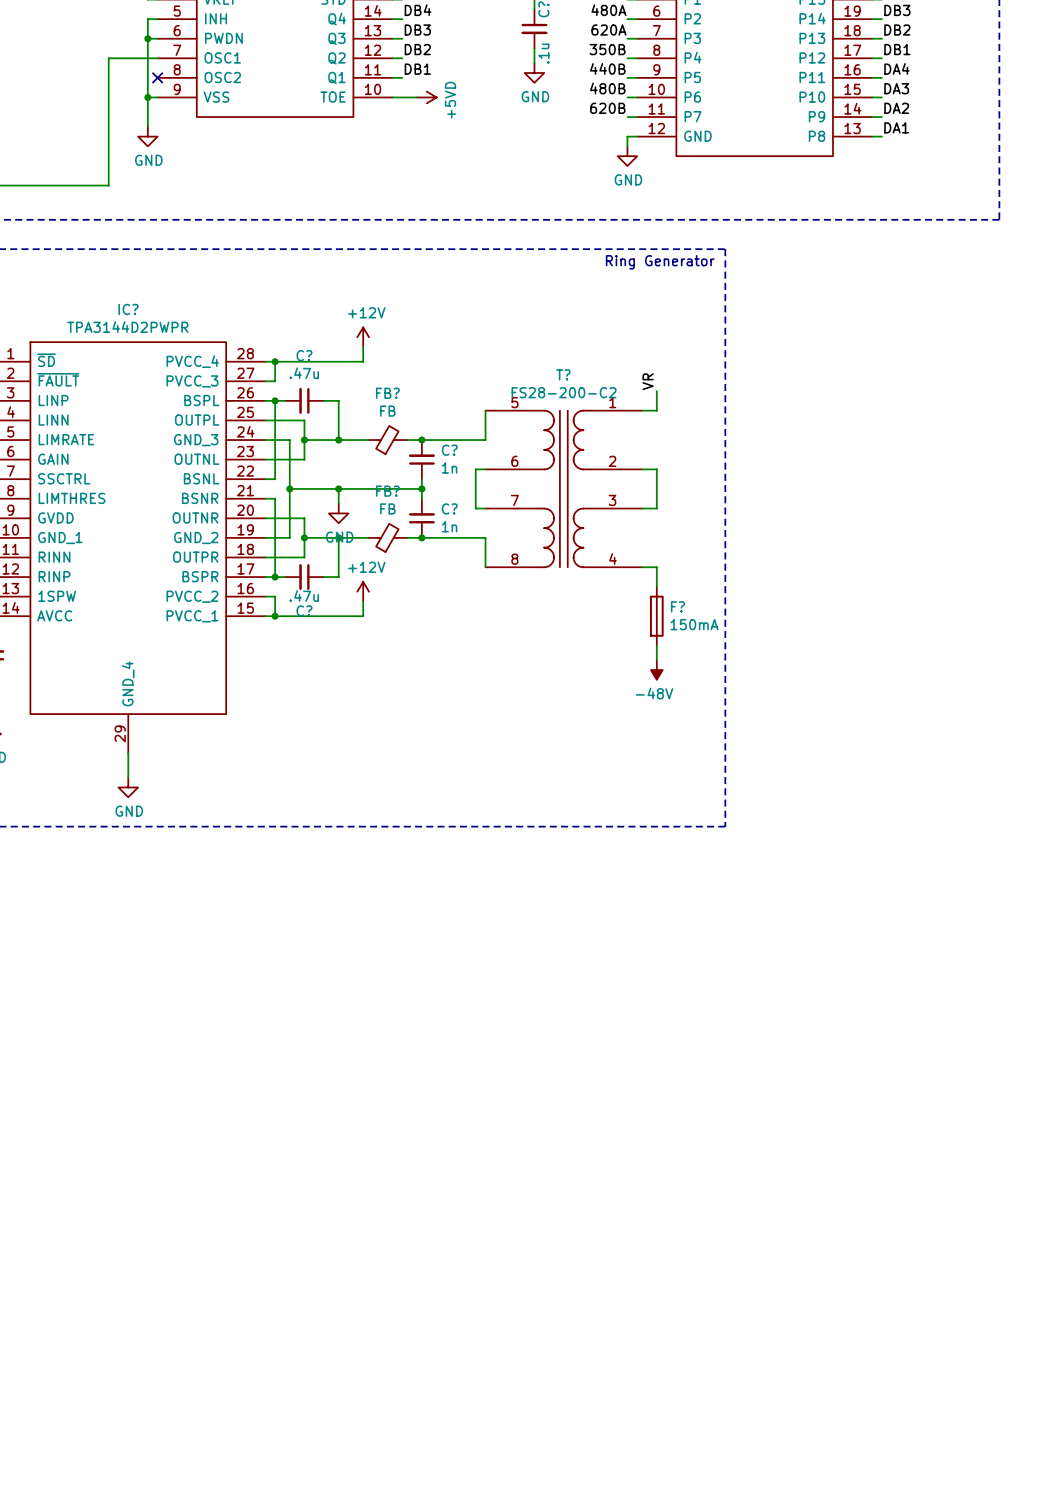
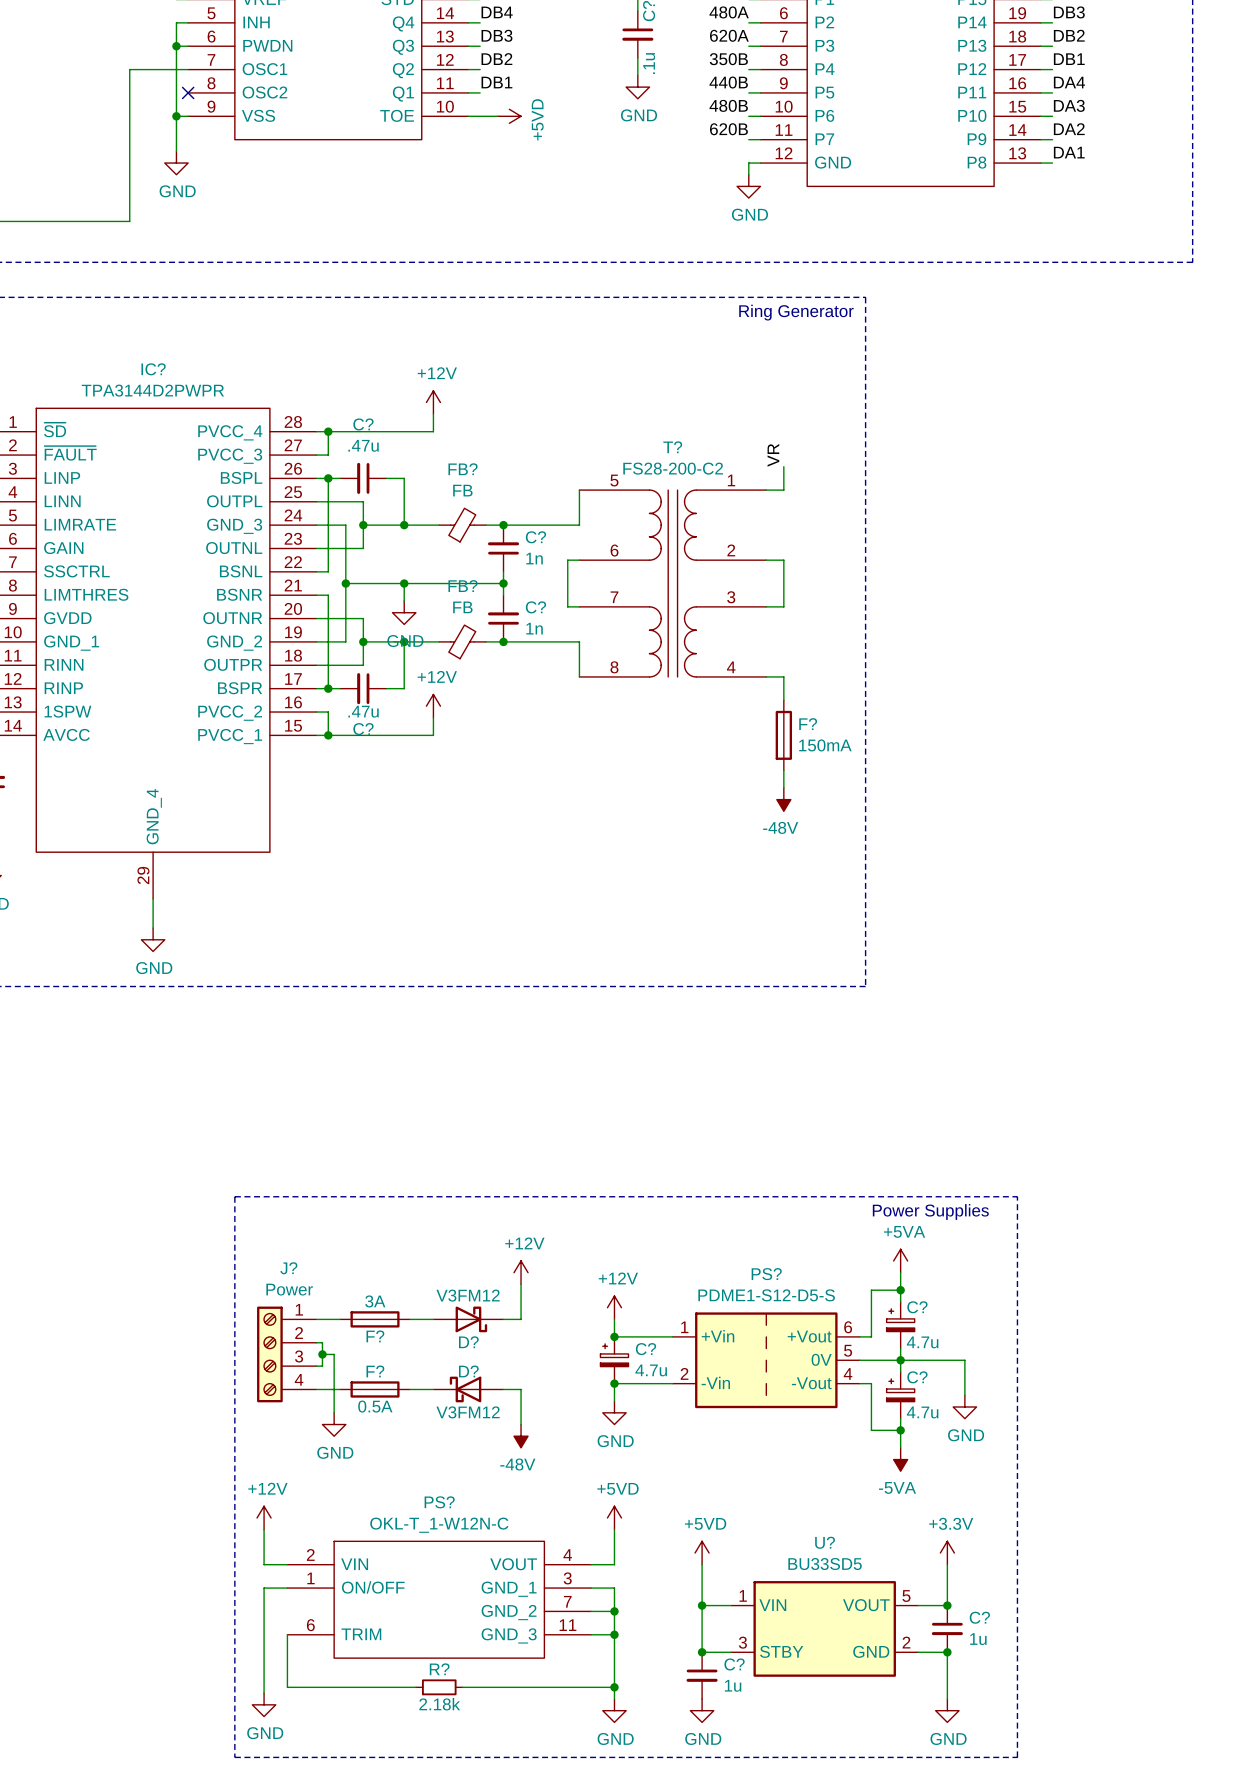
line: none -> (234, 1196) (234, 1757) (1017, 1757) (1017, 1196) (234, 1196)
text: none -> Power Supplies (930, 1211)
power symbol: none -> +5VA (900, 1261)
power symbol: none -> +12V (521, 1272)
wire: none -> (900, 1272) (900, 1301)
wire: none -> (521, 1284) (521, 1319) (503, 1319)
wire: none -> (900, 1290) (871, 1290) (871, 1336) (859, 1336)
junction: none -> (900, 1290)
power symbol: none -> +12V (614, 1307)
wire: none -> (316, 1319) (339, 1319)
F?: none -> 3A (375, 1319)
wire: none -> (410, 1319) (433, 1319)
D?: none -> V3FM12 (468, 1319)
wire: none -> (614, 1319) (614, 1336) (672, 1336)
C?: none -> 4.7u (900, 1325)
junction: none -> (614, 1336)
wire: none -> (316, 1342) (322, 1342) (322, 1366) (316, 1366)
wire: none -> (900, 1348) (900, 1371)
J?: none -> Power (286, 1354)
wire: none -> (322, 1354) (334, 1354) (334, 1412)
junction: none -> (322, 1354)
C?: none -> 4.7u (614, 1360)
PS?: none -> PDME1-S12-D5-S (766, 1360)
wire: none -> (859, 1360) (964, 1360) (964, 1395)
junction: none -> (900, 1360)
junction: none -> (614, 1383)
wire: none -> (672, 1383) (614, 1383) (614, 1401)
wire: none -> (859, 1383) (871, 1383) (871, 1430) (900, 1430)
wire: none -> (316, 1389) (339, 1389)
F?: none -> 0.5A (375, 1389)
wire: none -> (410, 1389) (433, 1389)
D?: none -> V3FM12 (468, 1389)
wire: none -> (503, 1389) (521, 1389) (521, 1424)
C?: none -> 4.7u (900, 1395)
power symbol: none -> GND (964, 1407)
power symbol: none -> GND (614, 1412)
wire: none -> (900, 1418) (900, 1447)
power symbol: none -> GND (334, 1424)
junction: none -> (900, 1430)
power symbol: none -> -48V (521, 1436)
power symbol: none -> -5VA (900, 1459)
power symbol: none -> +12V (264, 1517)
power symbol: none -> +5VD (614, 1517)
wire: none -> (264, 1529) (264, 1564) (287, 1564)
wire: none -> (614, 1529) (614, 1564) (591, 1564)
power symbol: none -> +5VD (702, 1553)
power symbol: none -> +3.3V (947, 1553)
wire: none -> (702, 1564) (702, 1652) (731, 1652)
wire: none -> (947, 1564) (947, 1605) (918, 1605)
wire: none -> (287, 1588) (264, 1588) (264, 1693)
wire: none -> (591, 1588) (614, 1588) (614, 1699)
PS?: none -> OKL-T_1-W12N-C (439, 1599)
wire: none -> (702, 1605) (731, 1605)
junction: none -> (702, 1605)
junction: none -> (947, 1605)
wire: none -> (591, 1611) (614, 1611)
junction: none -> (614, 1611)
U?: none -> BU33SD5 (824, 1628)
C?: none -> 1u (947, 1628)
wire: none -> (287, 1634) (287, 1687) (415, 1687)
wire: none -> (591, 1634) (614, 1634)
junction: none -> (614, 1634)
junction: none -> (702, 1652)
wire: none -> (918, 1652) (947, 1652) (947, 1699)
junction: none -> (947, 1652)
C?: none -> 1u (702, 1675)
R?: none -> 2.18k (439, 1687)
wire: none -> (462, 1687) (614, 1687)
junction: none -> (614, 1687)
power symbol: none -> GND (264, 1704)
power symbol: none -> GND (614, 1710)
power symbol: none -> GND (702, 1710)
power symbol: none -> GND (947, 1710)

